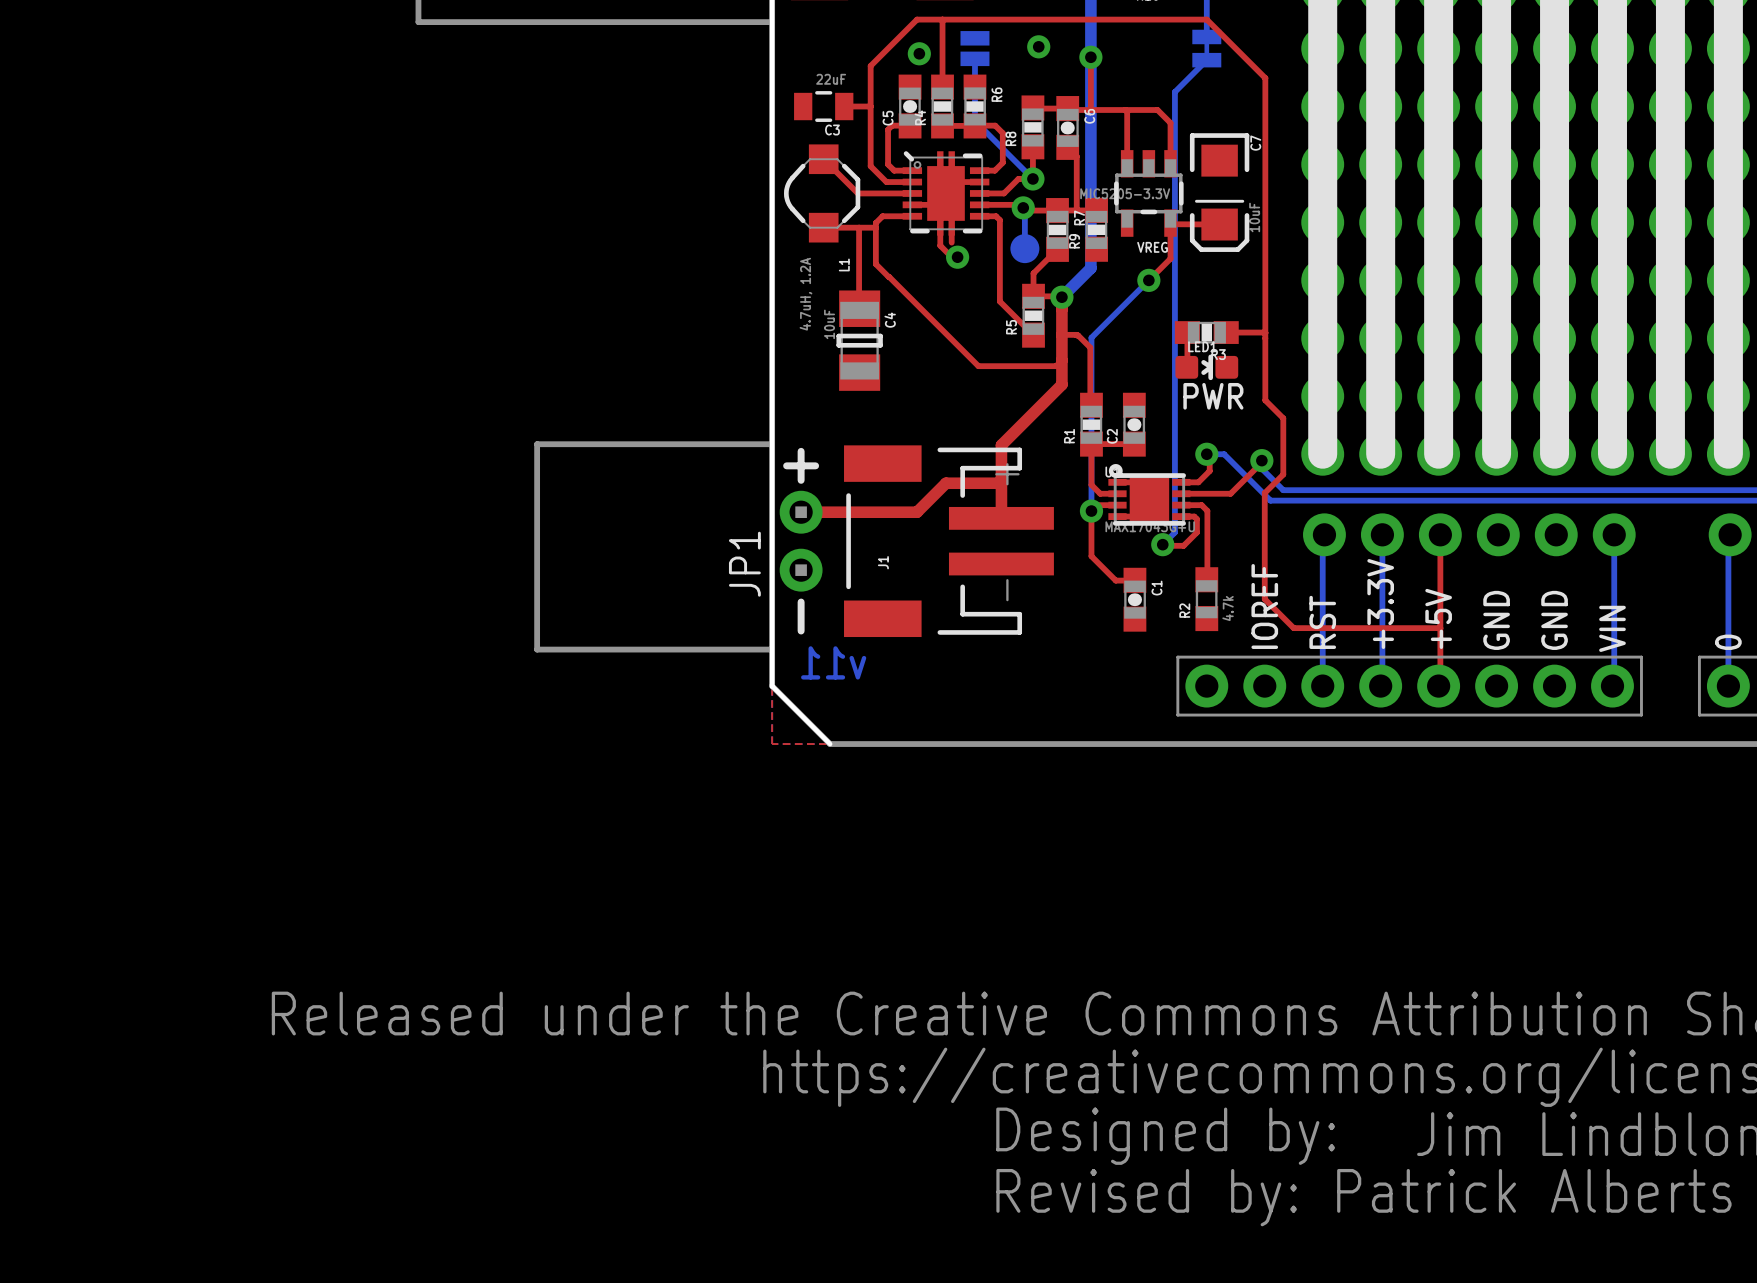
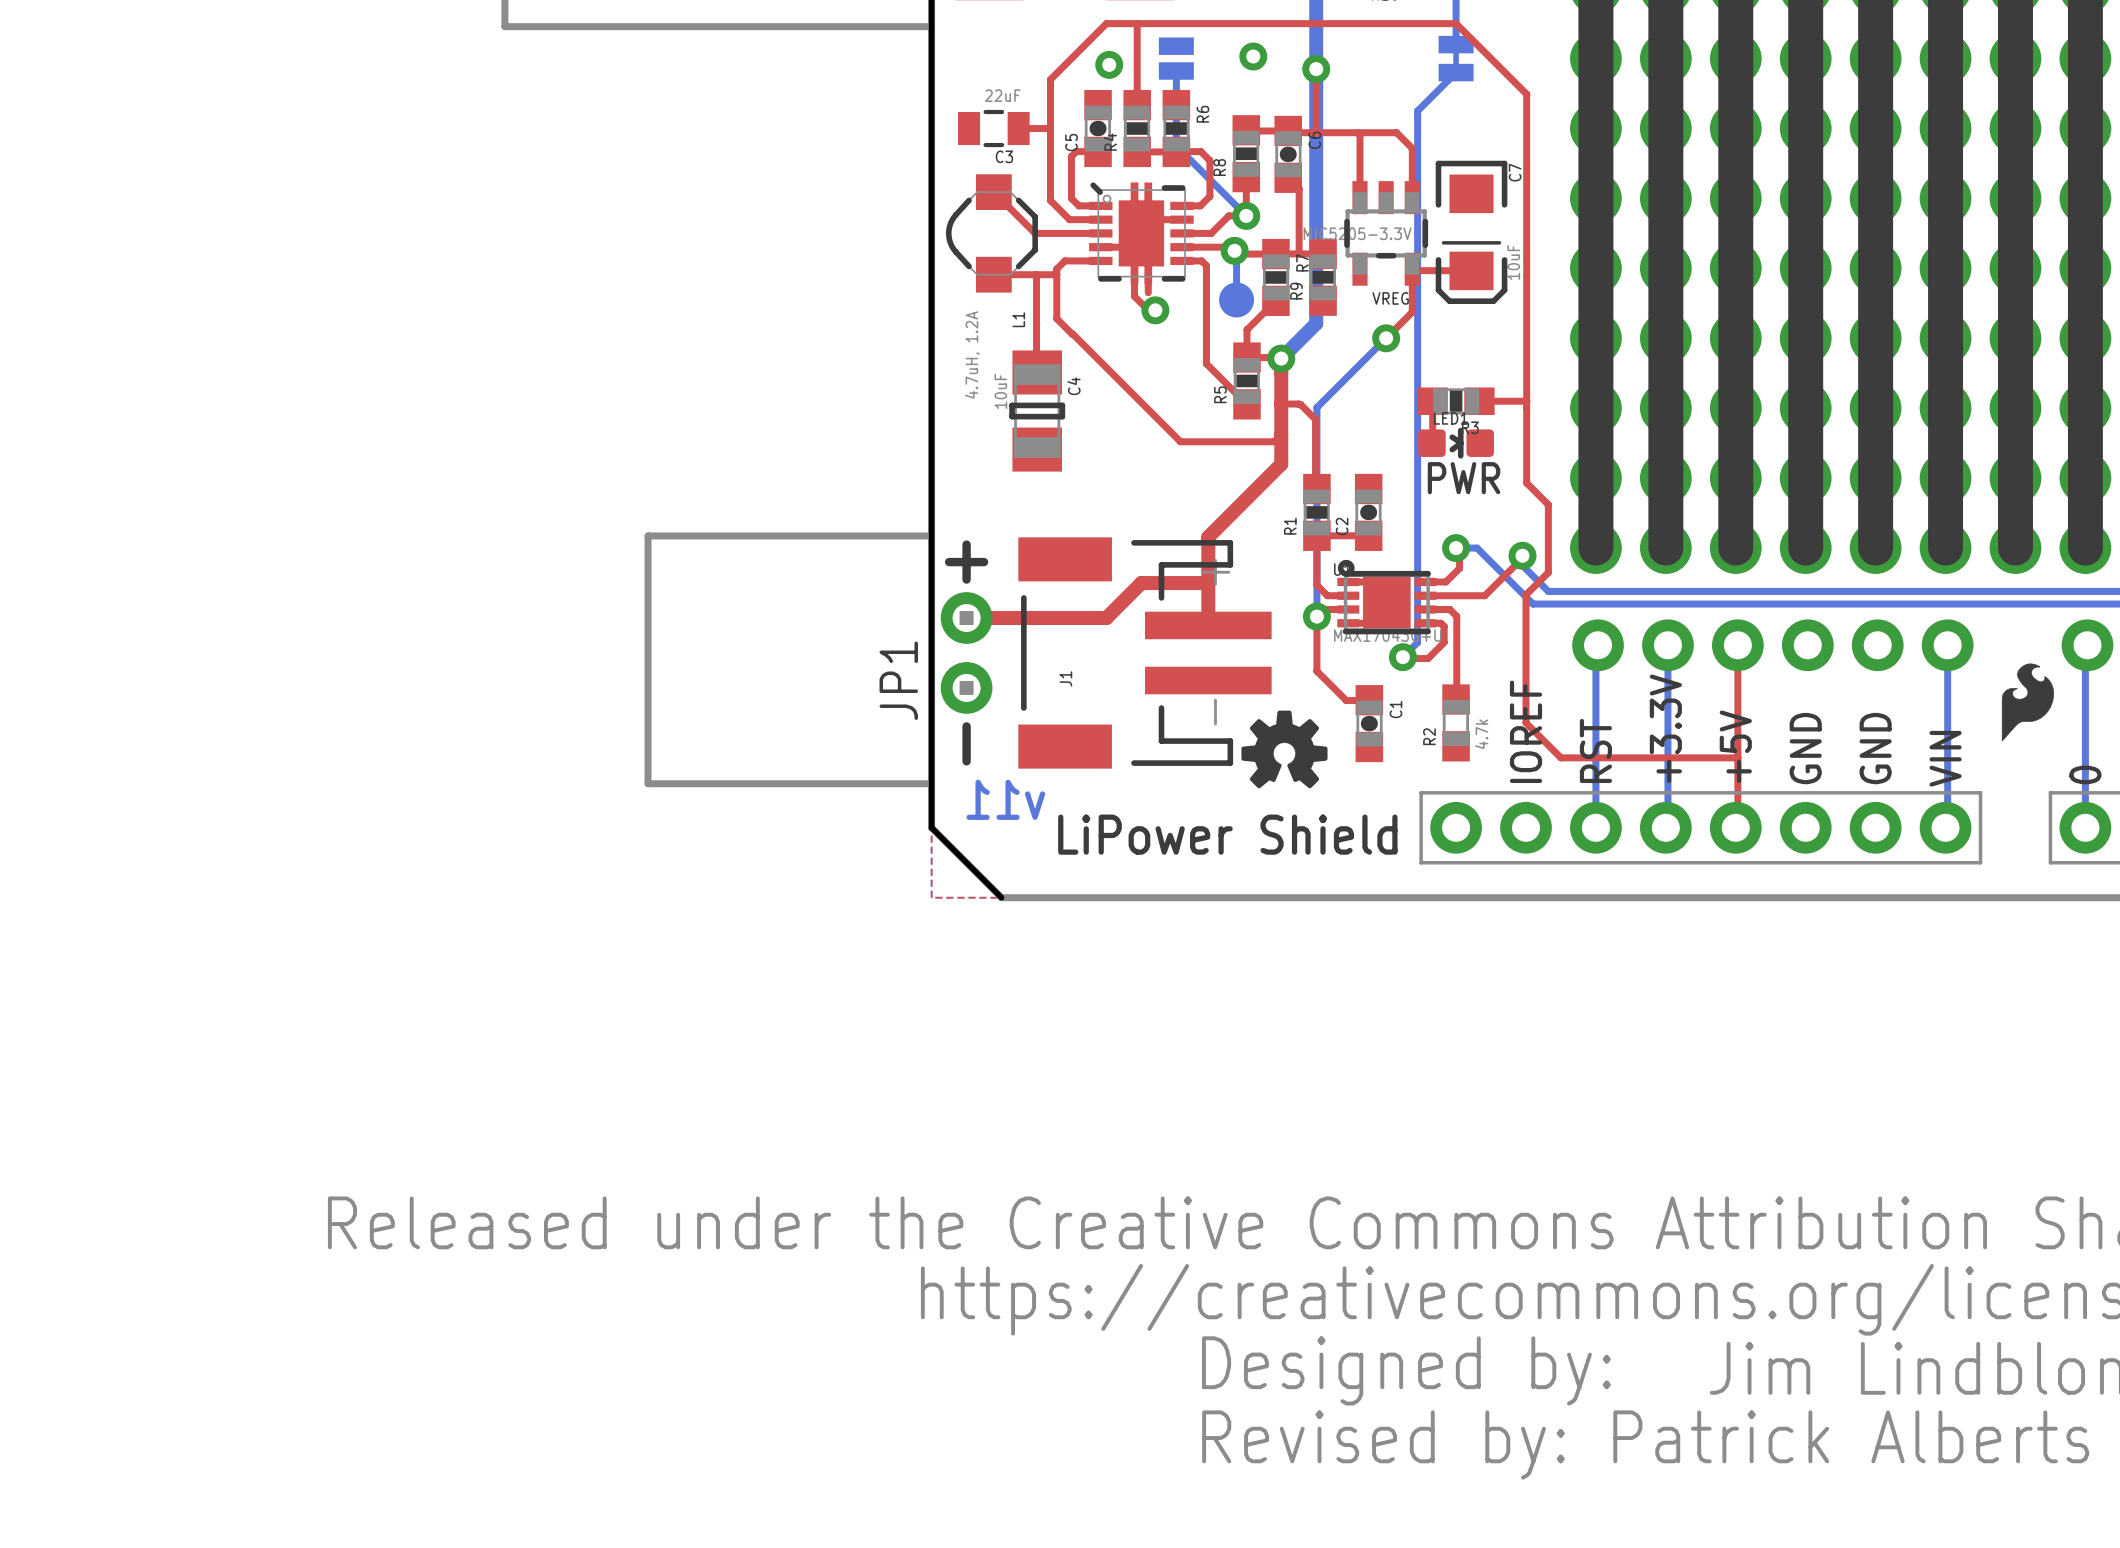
drawing: none -> [2001, 663, 2054, 742]
drawing: none -> [1241, 710, 1328, 789]
text: none -> LiPower Shield (1227, 834)

